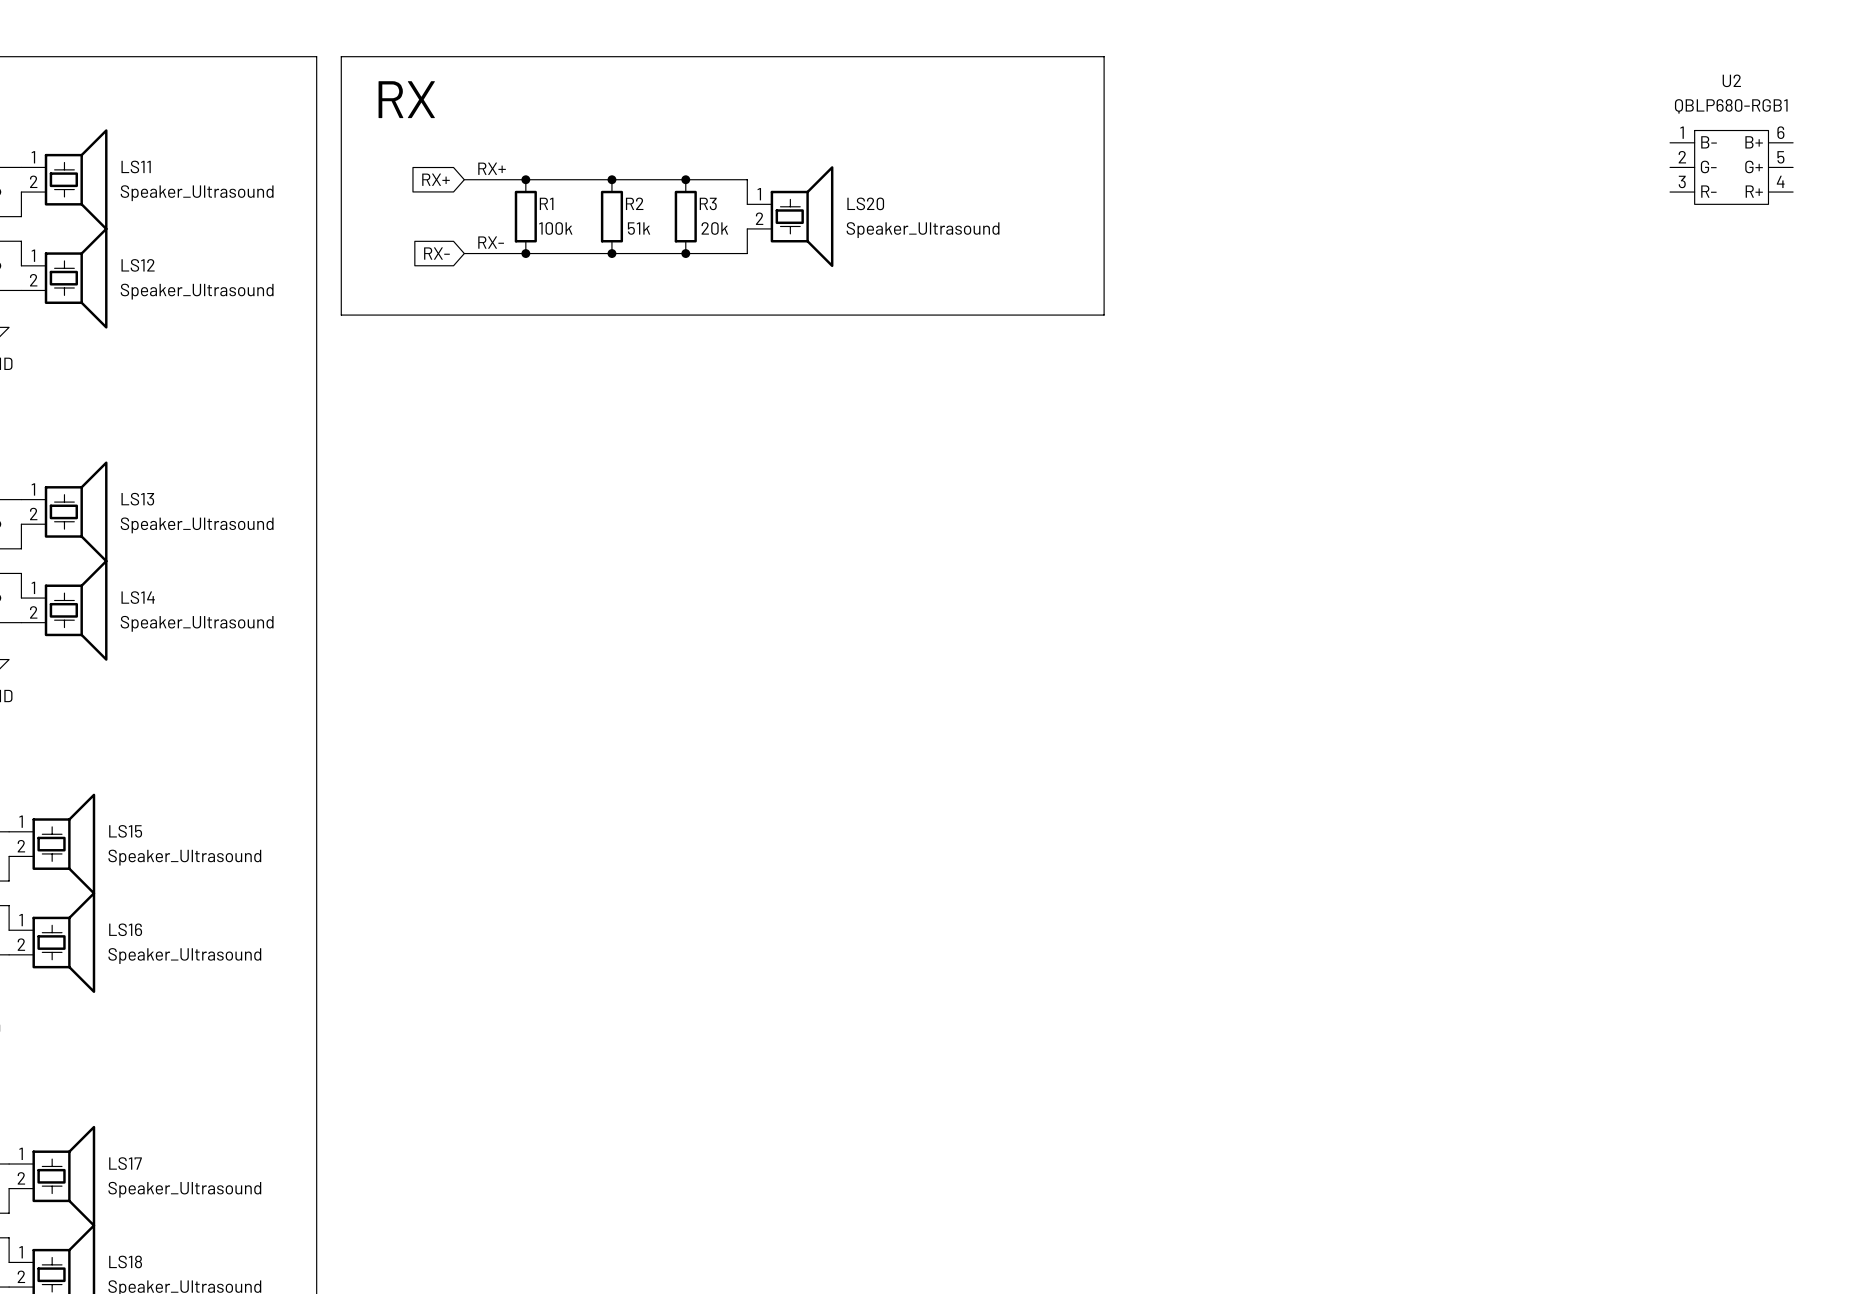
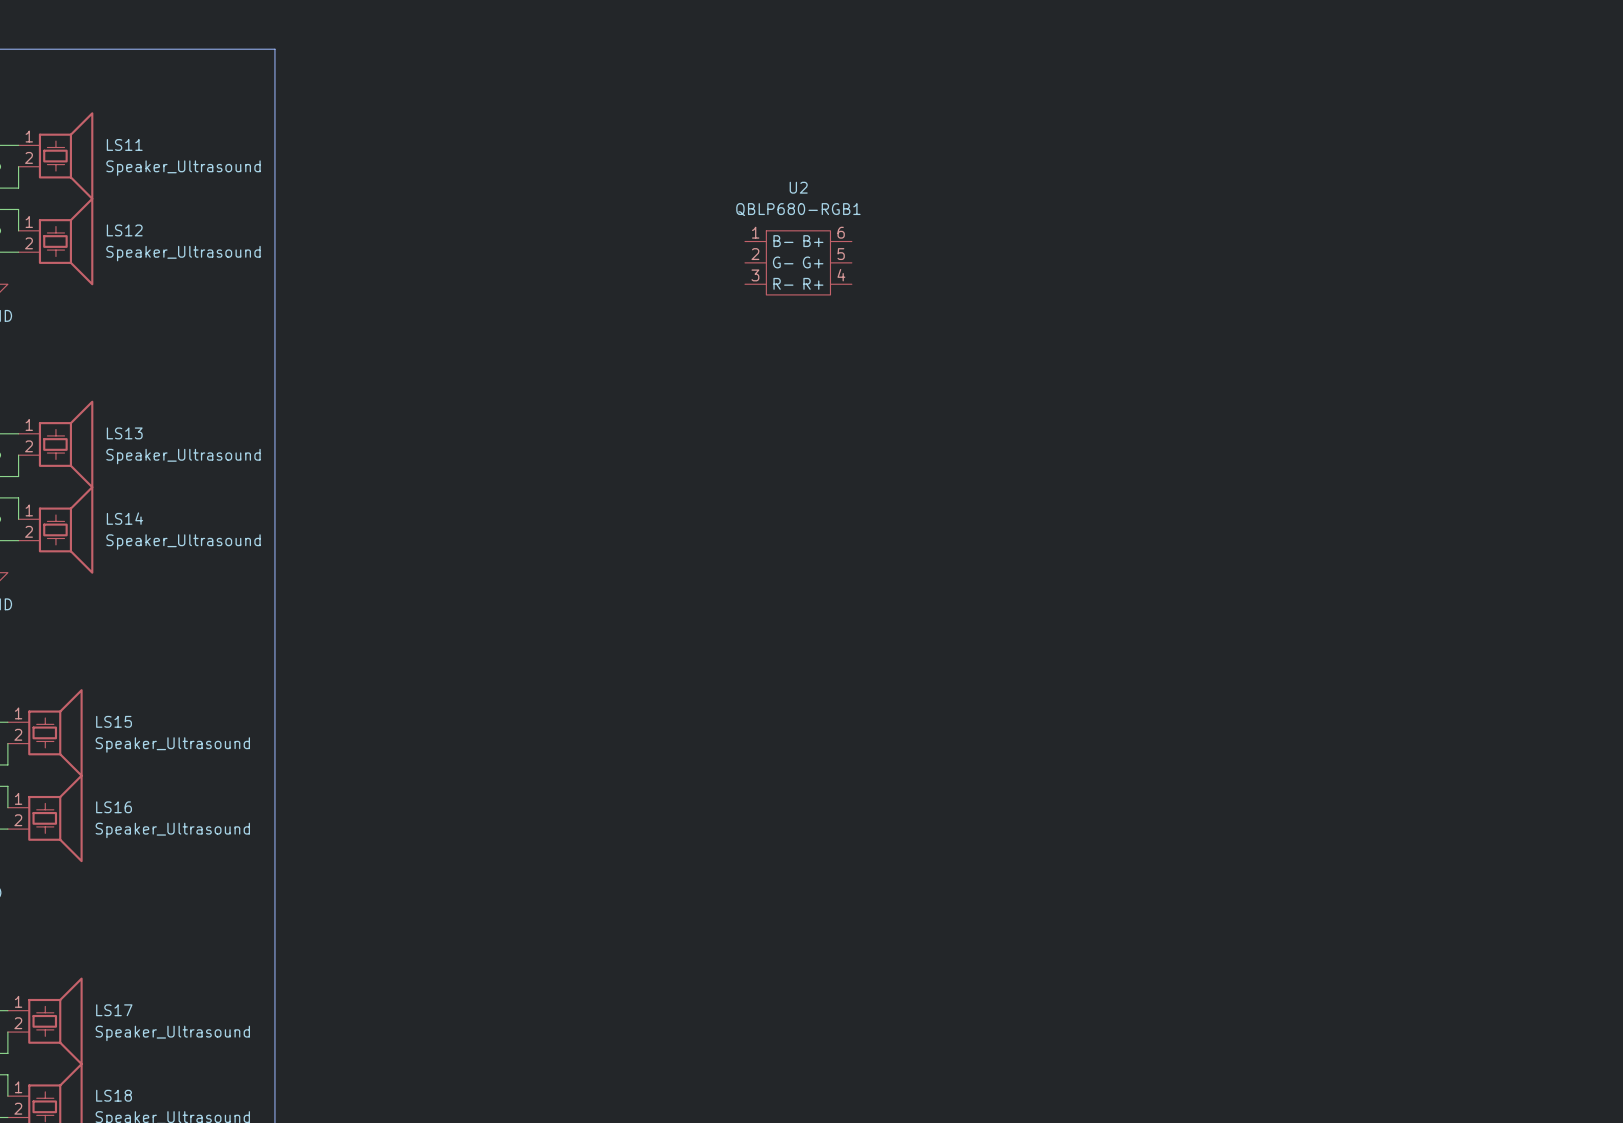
line: (341, 56) (1104, 56) (1104, 315) (341, 315) (341, 56) -> none
text: RX (406, 99) -> none
U2 position: (1731, 167) -> (798, 262)
label: RX+ (492, 168) -> none
global label: RX+ (436, 179) -> none
wire: (464, 179) (747, 179) (747, 204) -> none
junction: (525, 179) -> none
junction: (611, 179) -> none
junction: (685, 179) -> none
R1: 100k (525, 216) -> none
R2: 51k (611, 216) -> none
R3: 20k (685, 216) -> none
LS20: Speaker_Ultrasound (790, 216) -> none
wire: (747, 228) (747, 253) (464, 253) -> none
label: RX- (491, 242) -> none
global label: RX- (436, 253) -> none
junction: (525, 253) -> none
junction: (611, 253) -> none
junction: (685, 253) -> none

